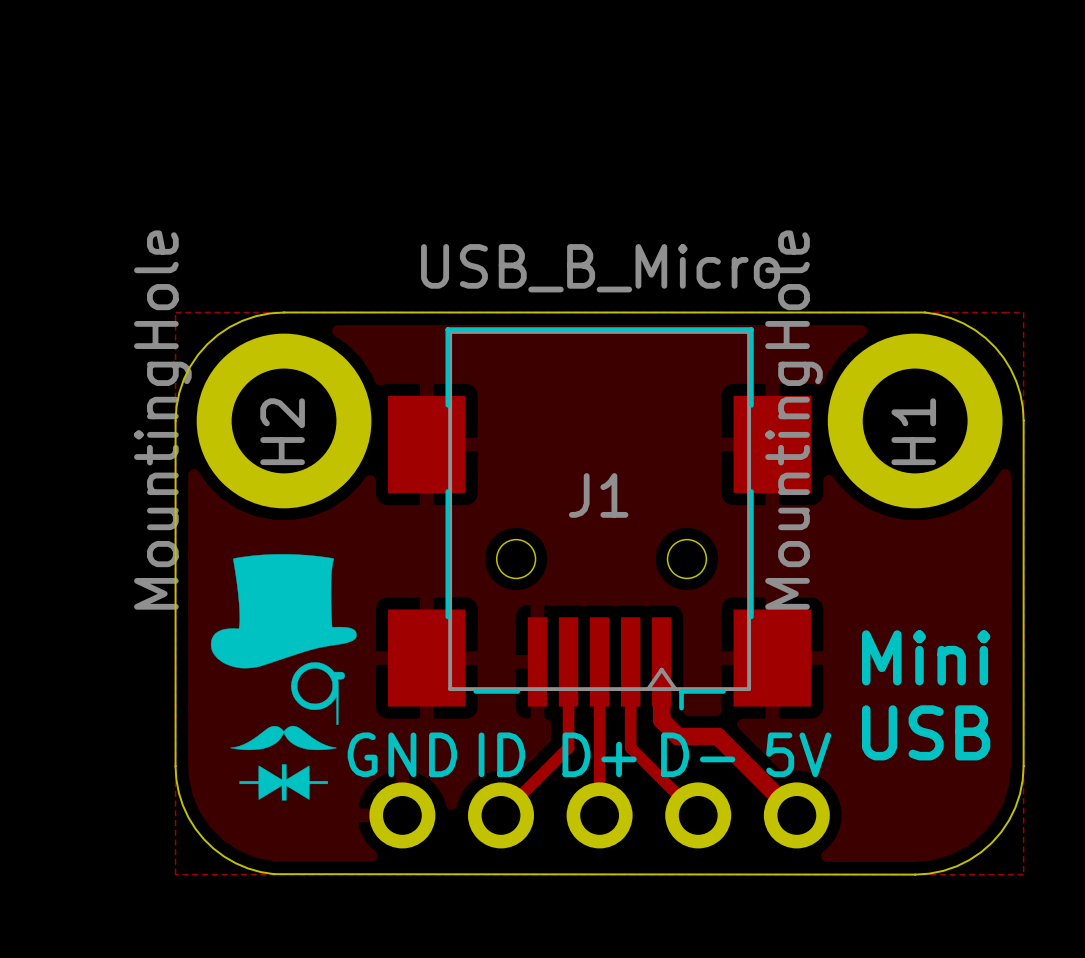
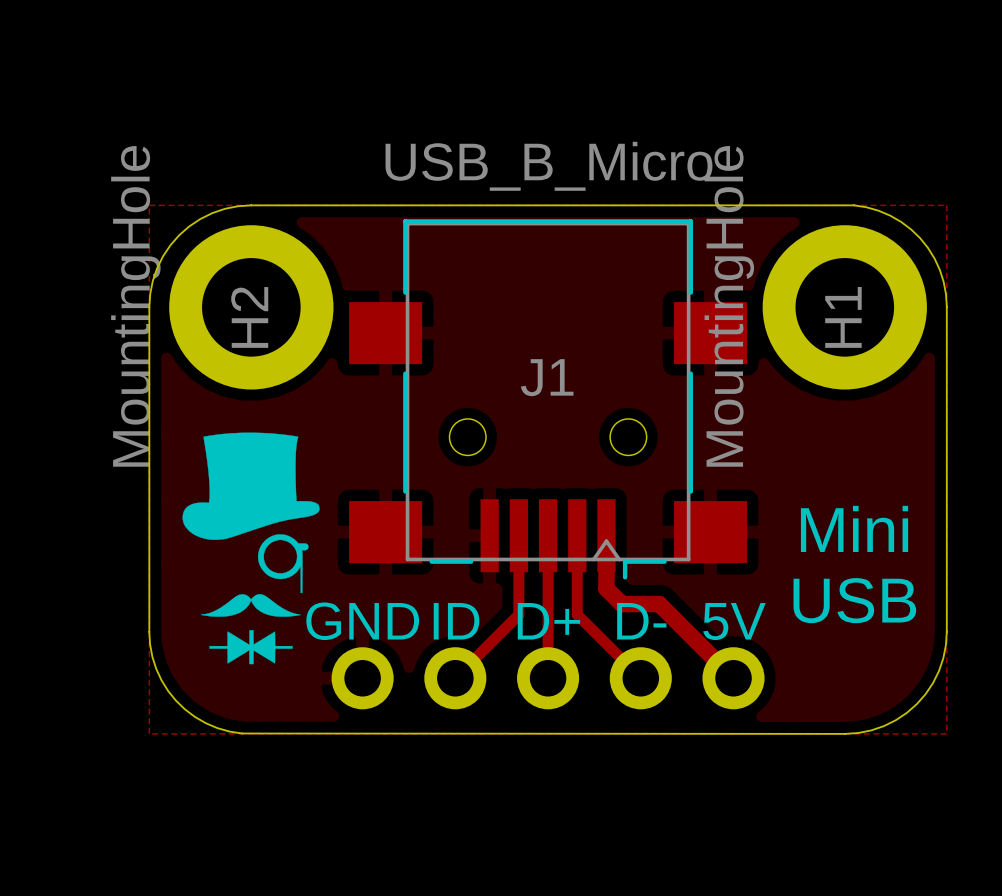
J1 footprint: [388, 327, 812, 711] -> [349, 219, 748, 580]

